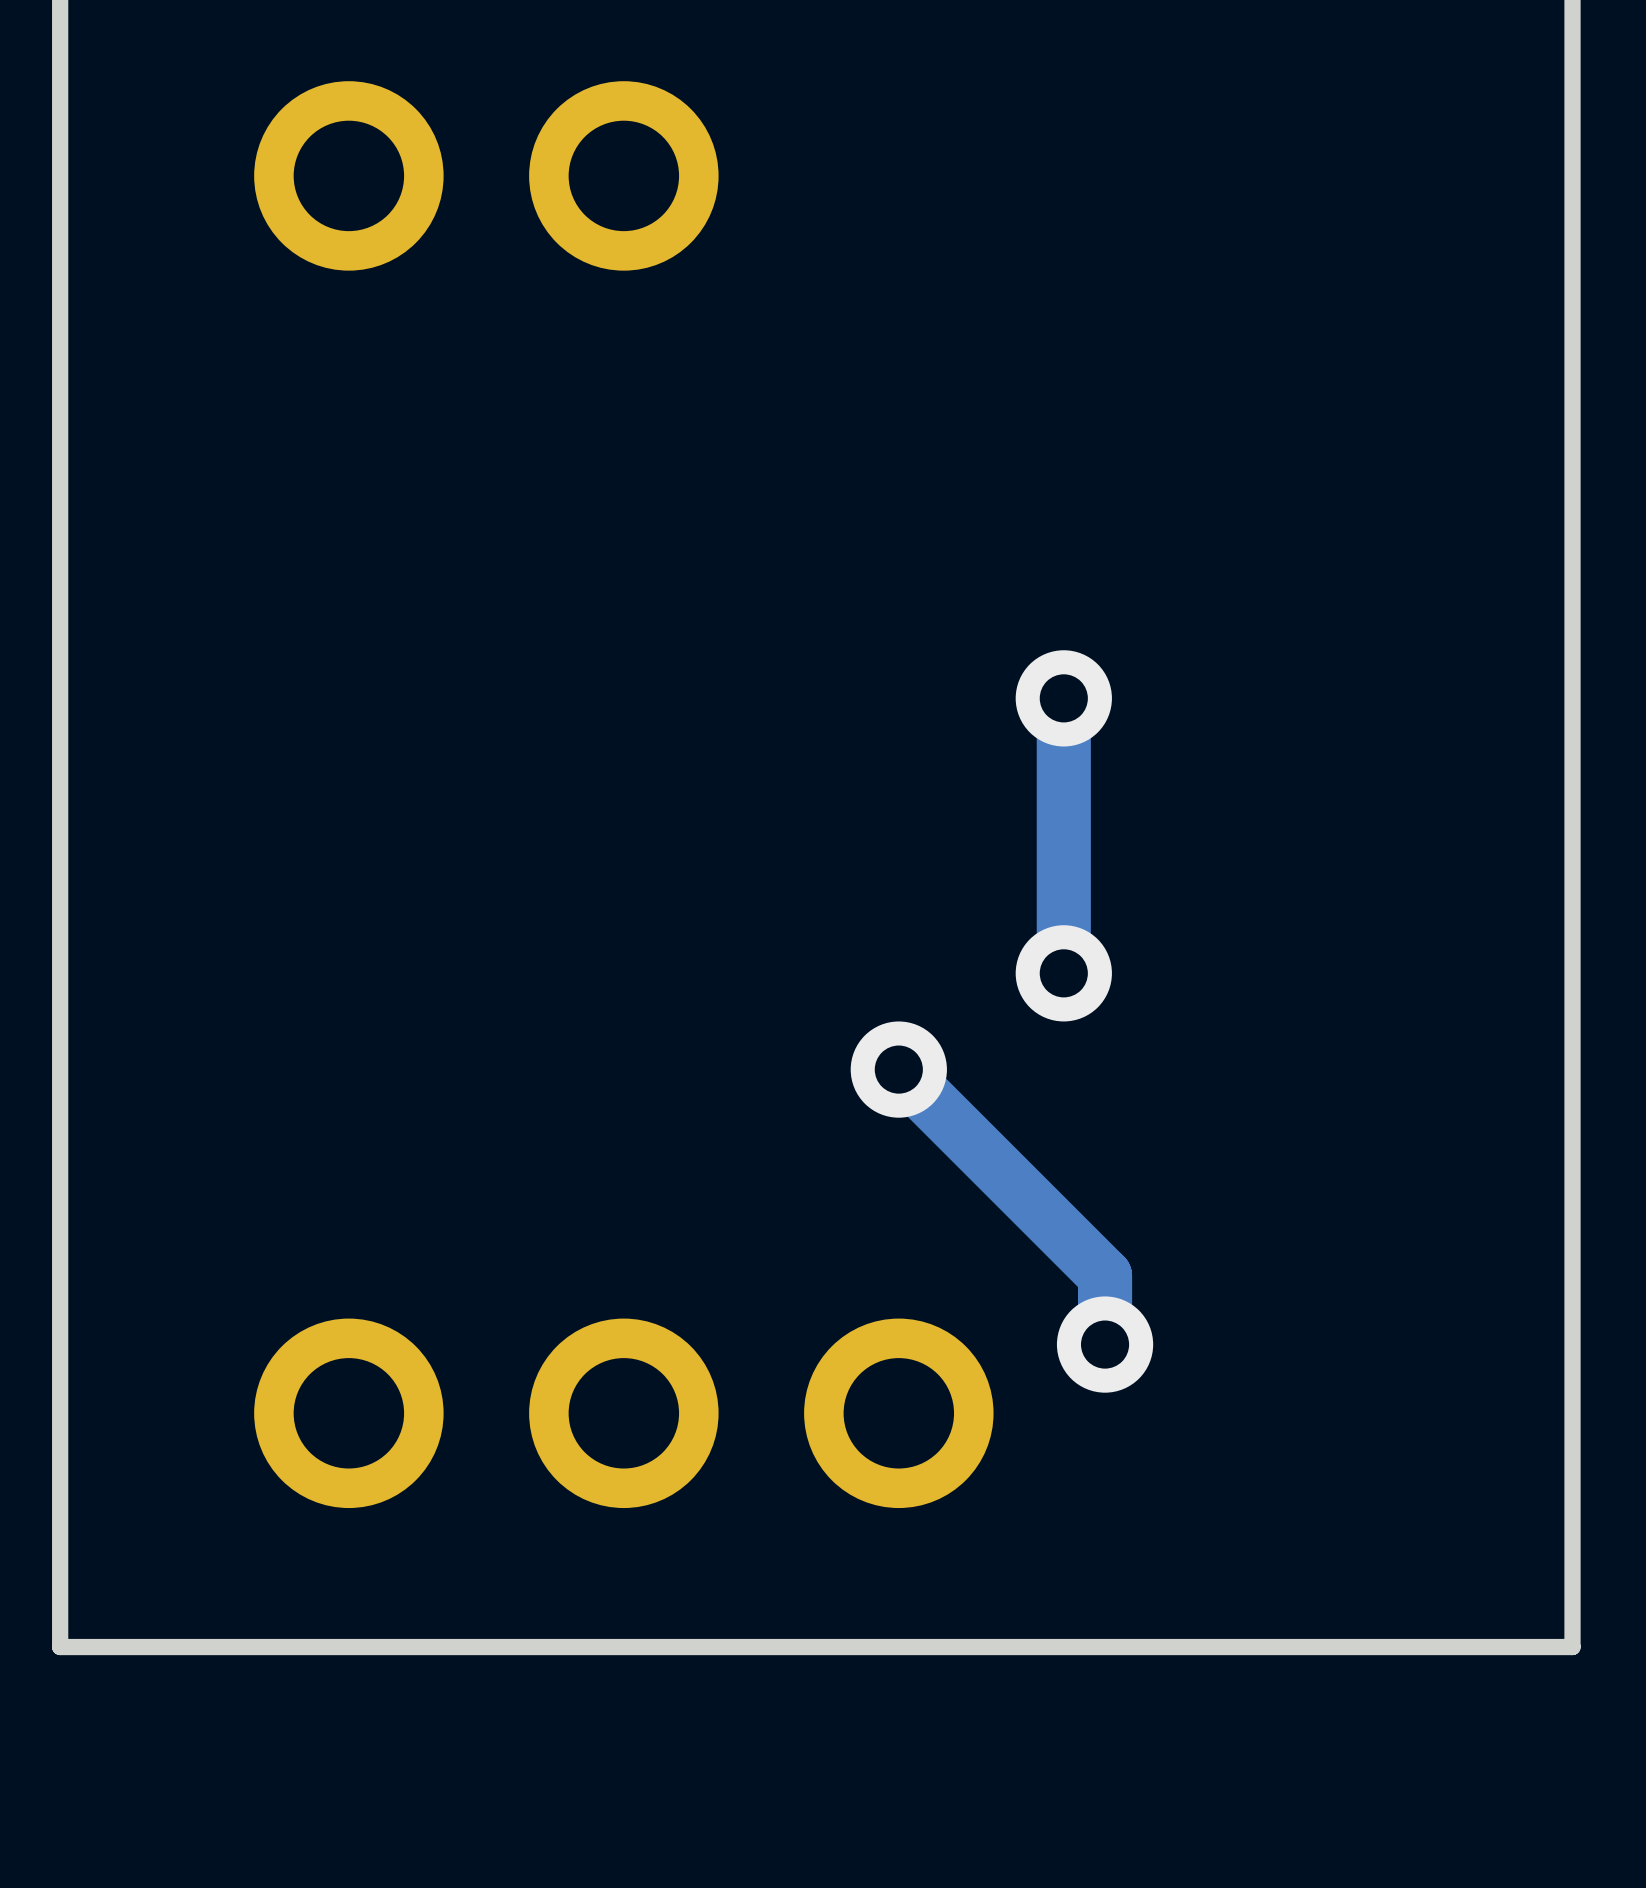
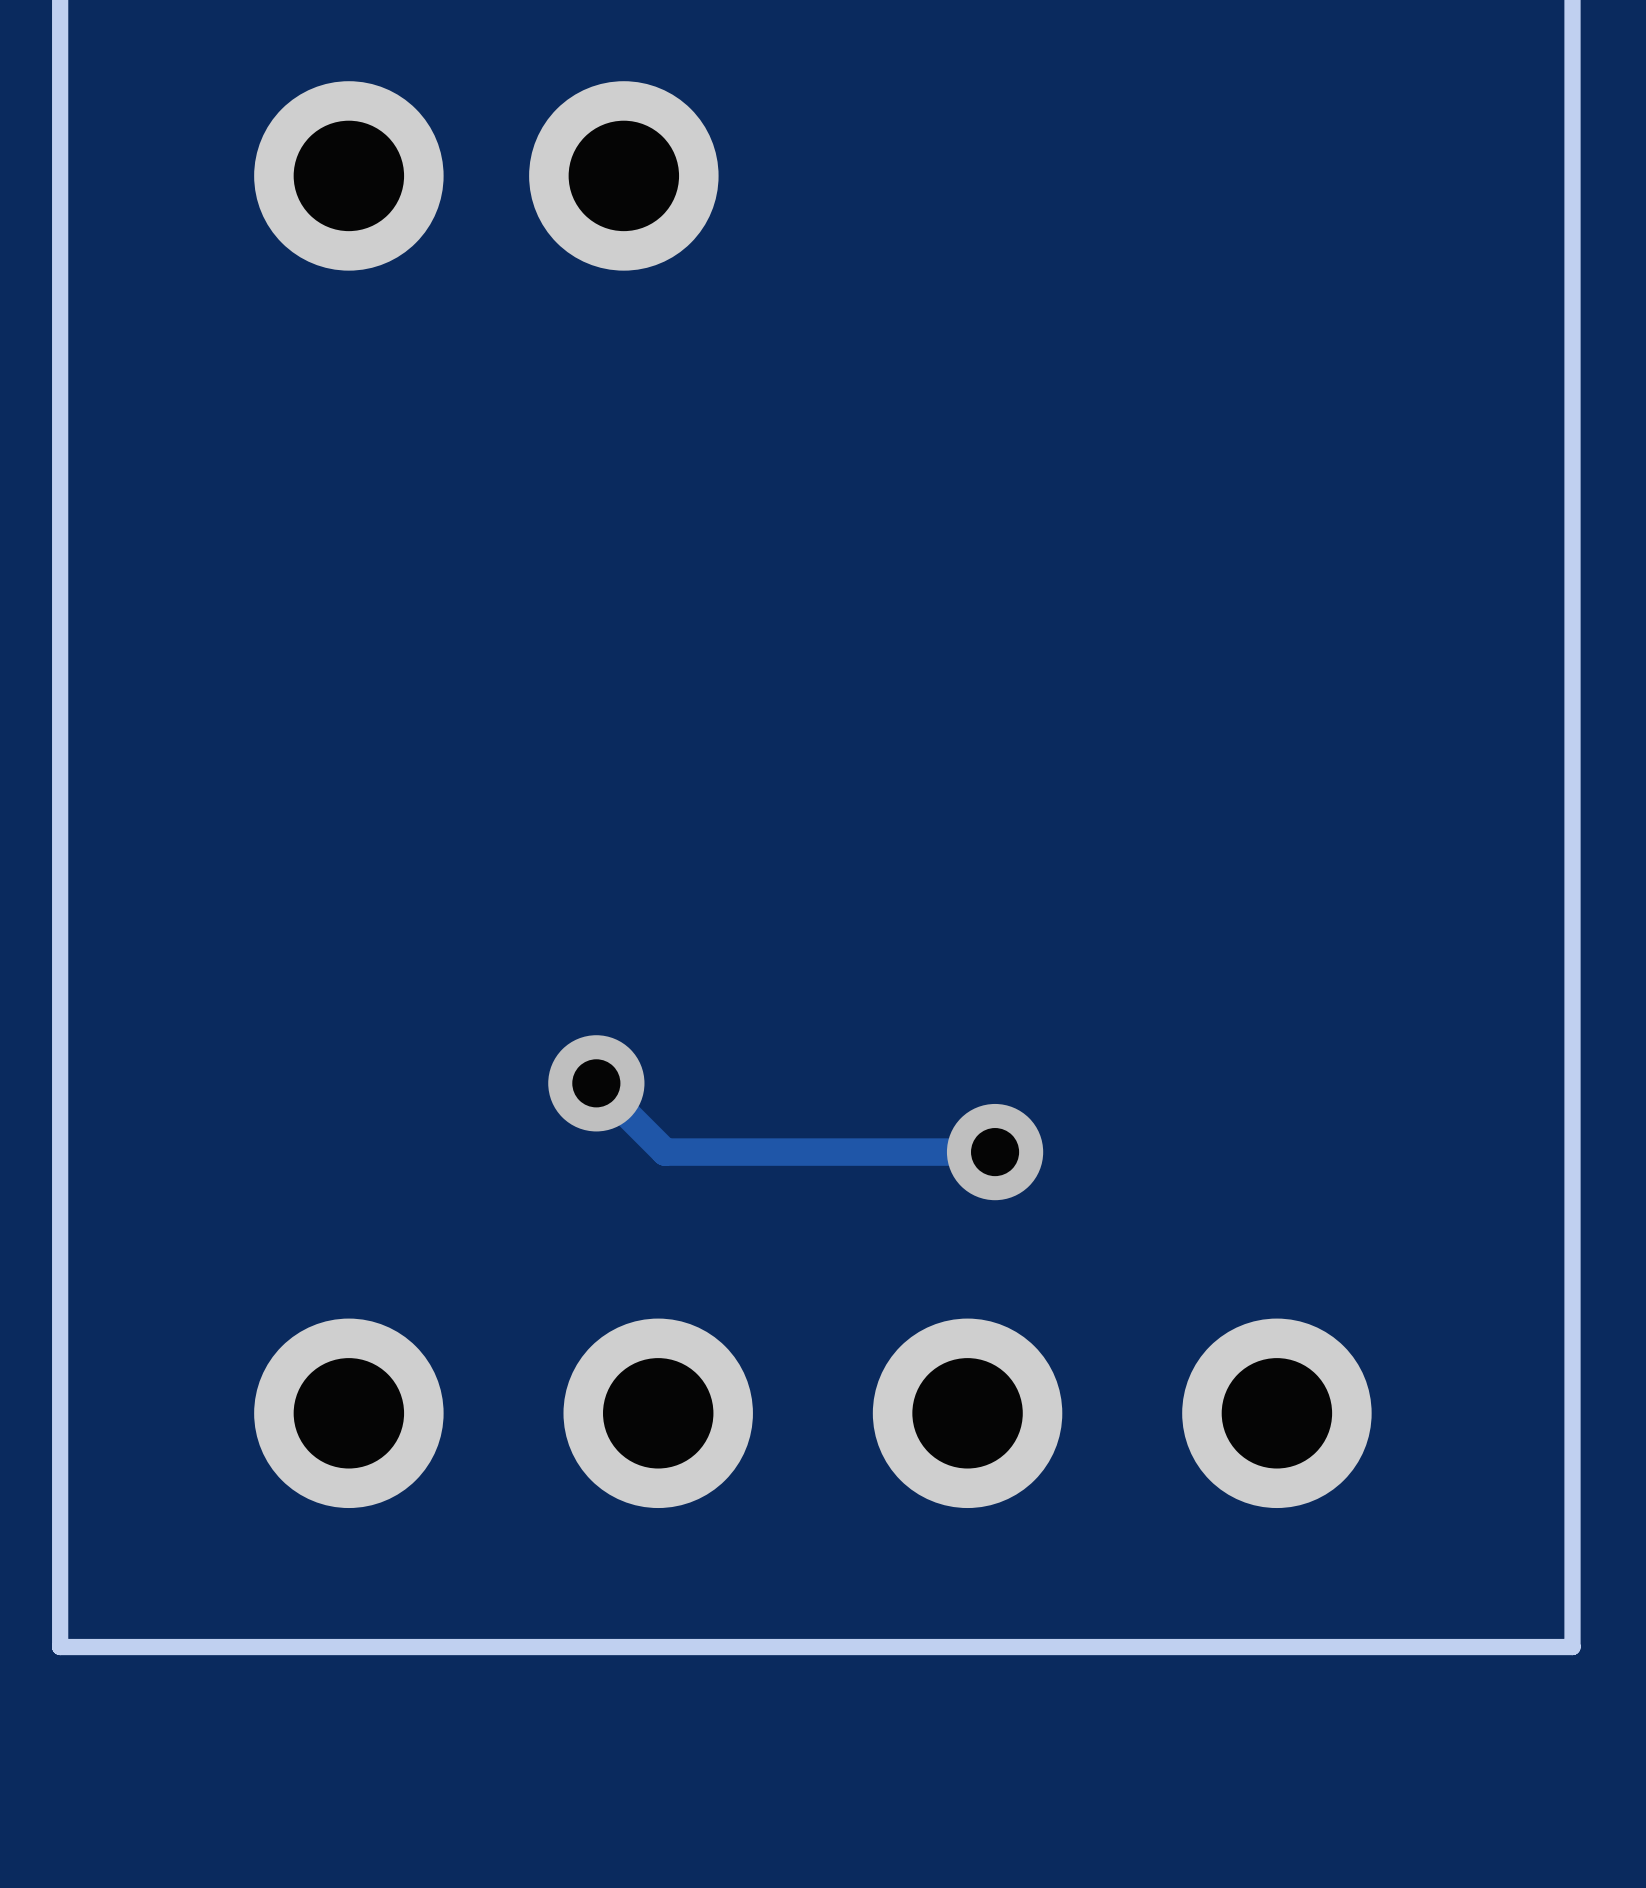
track: (1063, 698) (1063, 973) -> none
via: (1063, 698) -> none
via: (1063, 973) -> none
track: (898, 1069) (1105, 1275) (1105, 1344) -> none
via: (898, 1069) -> none
track: none -> (596, 1083) (665, 1152) (995, 1152)
via: none -> (596, 1083)
via: none -> (995, 1152)
via: (1105, 1344) -> none
part position: (623, 1413) -> (658, 1413)
part position: (898, 1413) -> (967, 1413)
part: none -> (1276, 1413)

